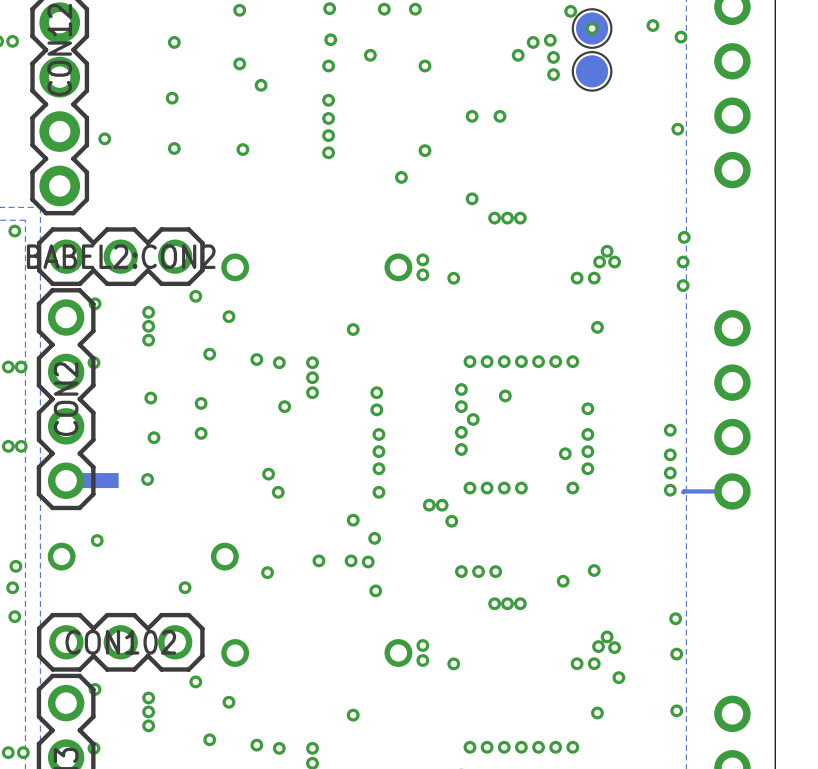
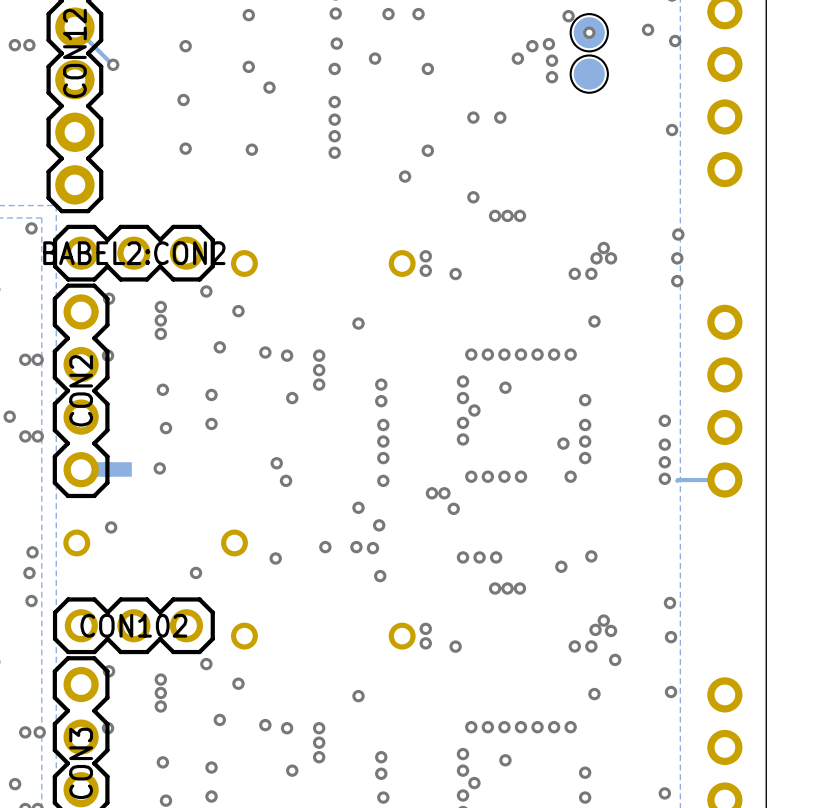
track: none -> (74, 27) (113, 64)
via position: (104, 138) -> (113, 64)

